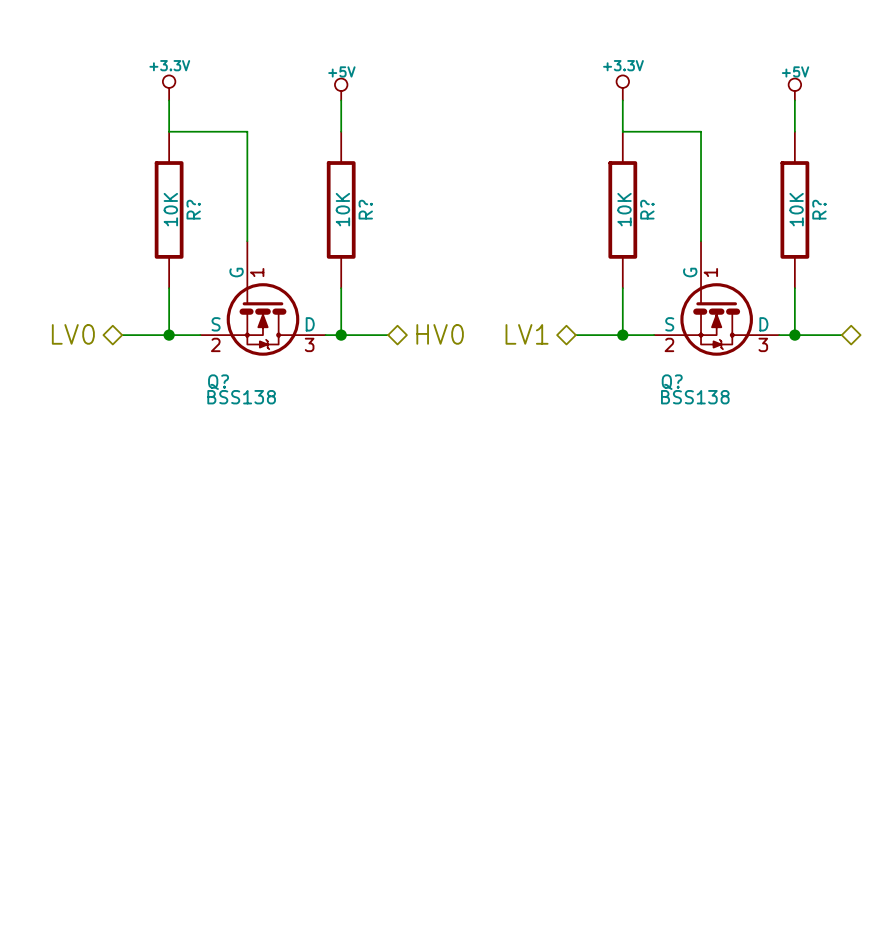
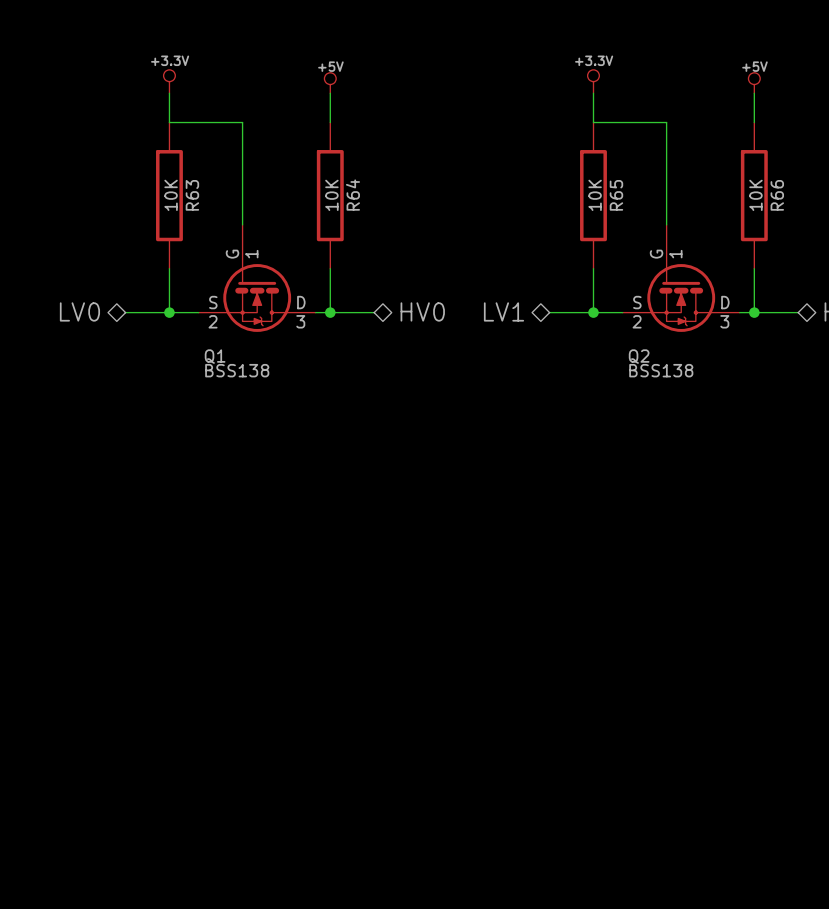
R? name: R? (193, 209) -> R63 (192, 195)
R? name: R? (365, 209) -> R64 (352, 195)
R? name: R? (647, 209) -> R65 (616, 195)
R? name: R? (819, 209) -> R66 (777, 195)
Q? name: Q? (218, 382) -> Q1 (215, 356)
Q? name: Q? (672, 382) -> Q2 (639, 356)

